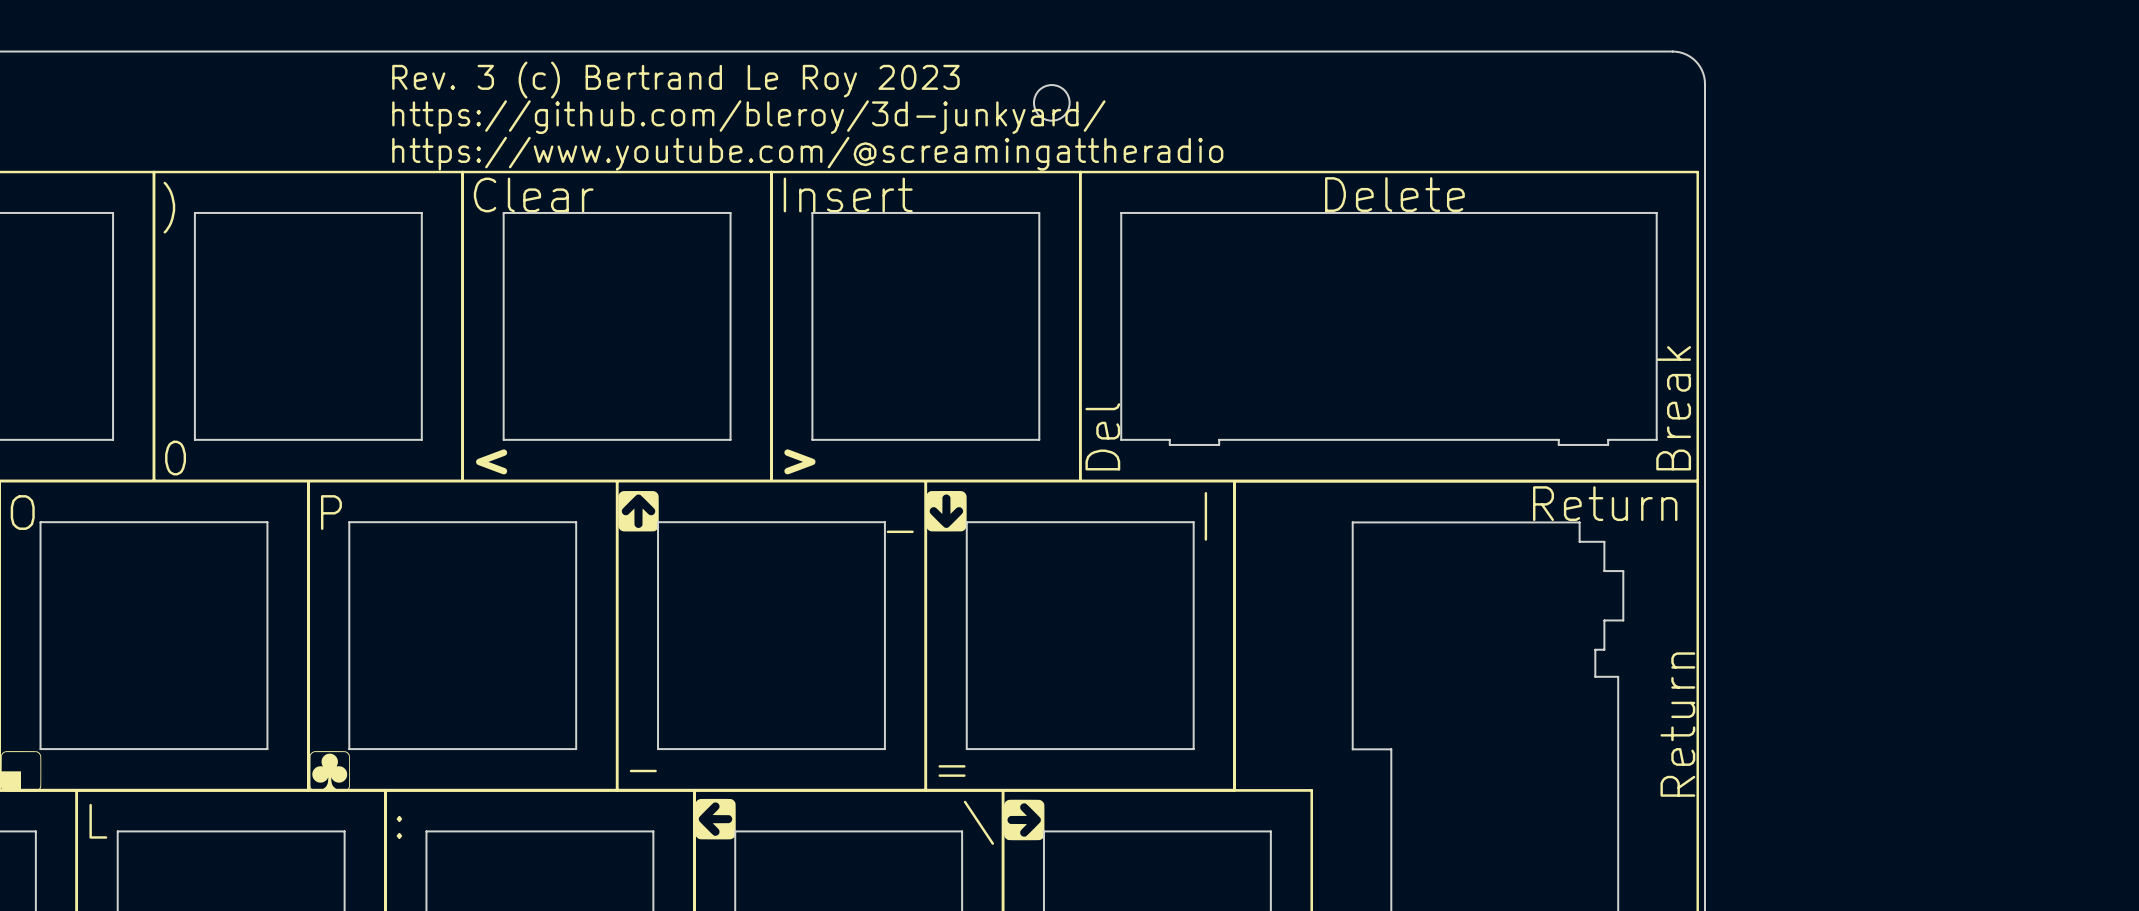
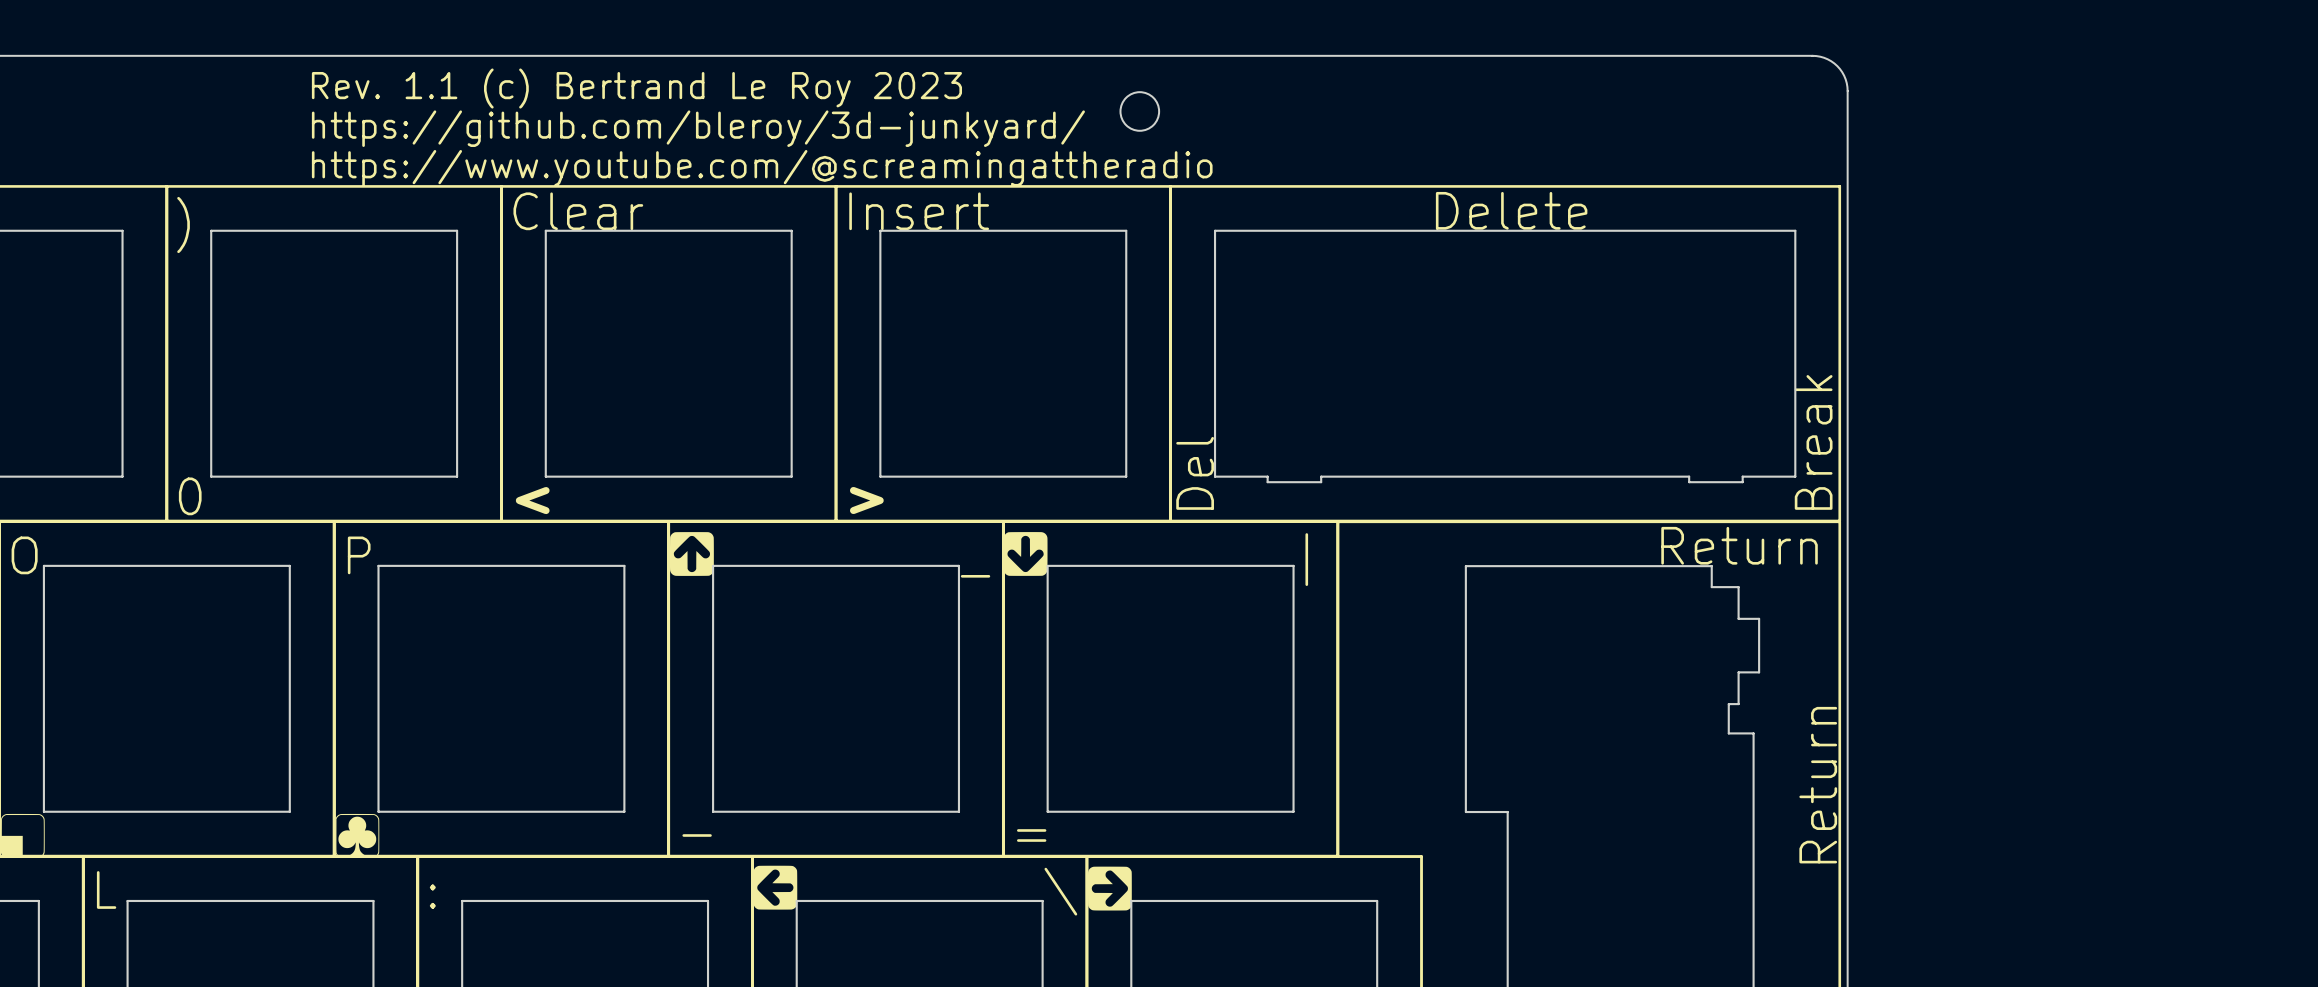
text: Rev. 3 (c) Bertrand Le Roy 2023 (675, 80) -> Rev. 1.1 (c) Bertrand Le Roy 2023 (636, 88)
text position: https://github.com/bleroy/3d-junkyard/ (748, 117) -> https://github.com/bleroy/3d-junkyard/ (698, 128)
text position: https://www.youtube.com/@screamingattheradio (807, 153) -> https://www.youtube.com/@screamingattheradio (762, 168)

